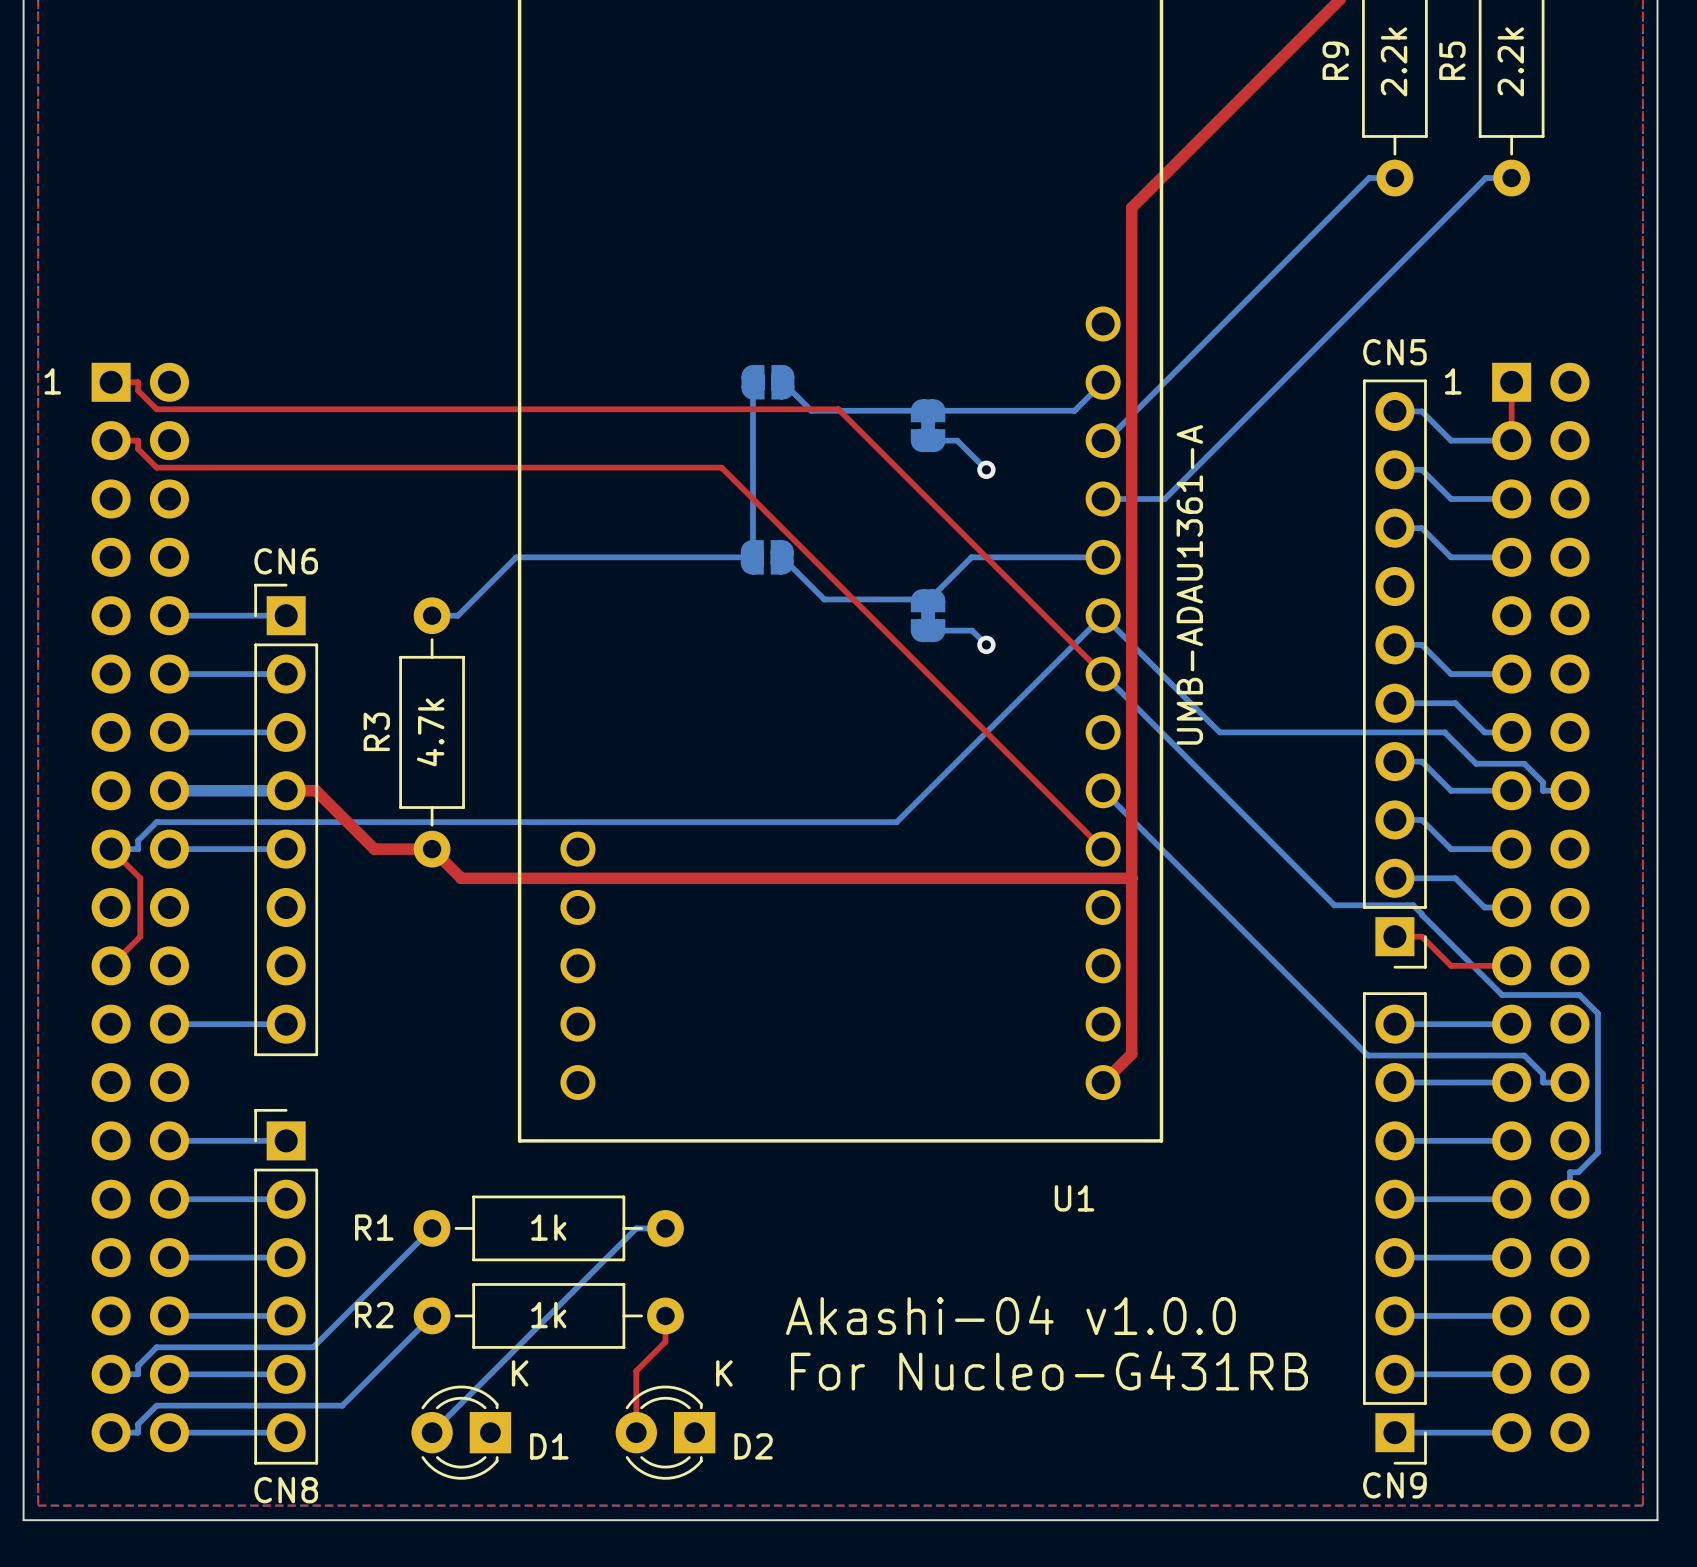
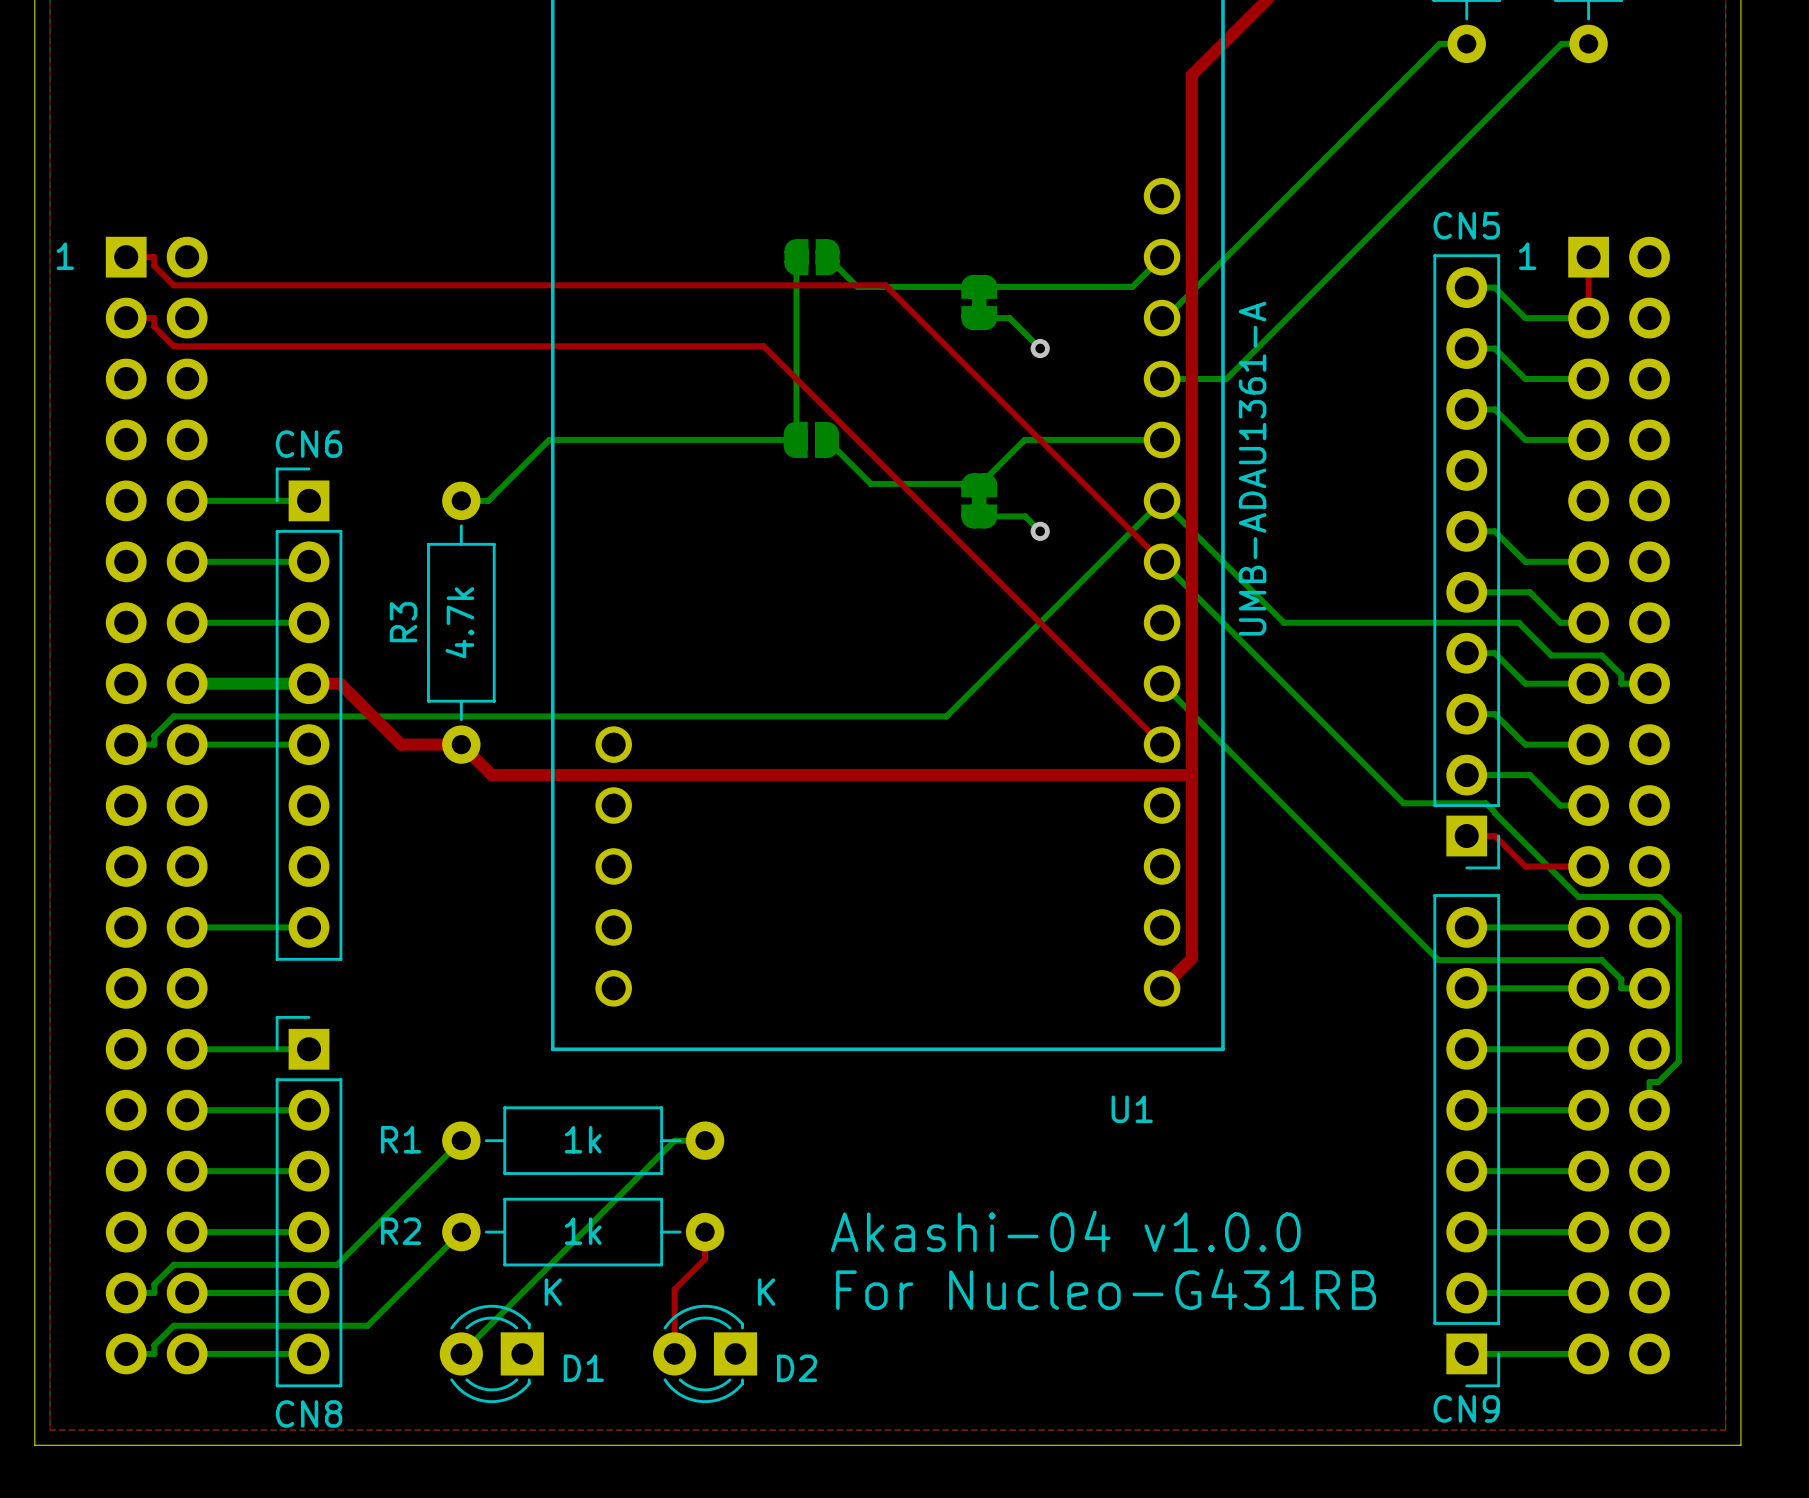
top track: (111, 849) (140, 878) (140, 936) (111, 965) -> none

